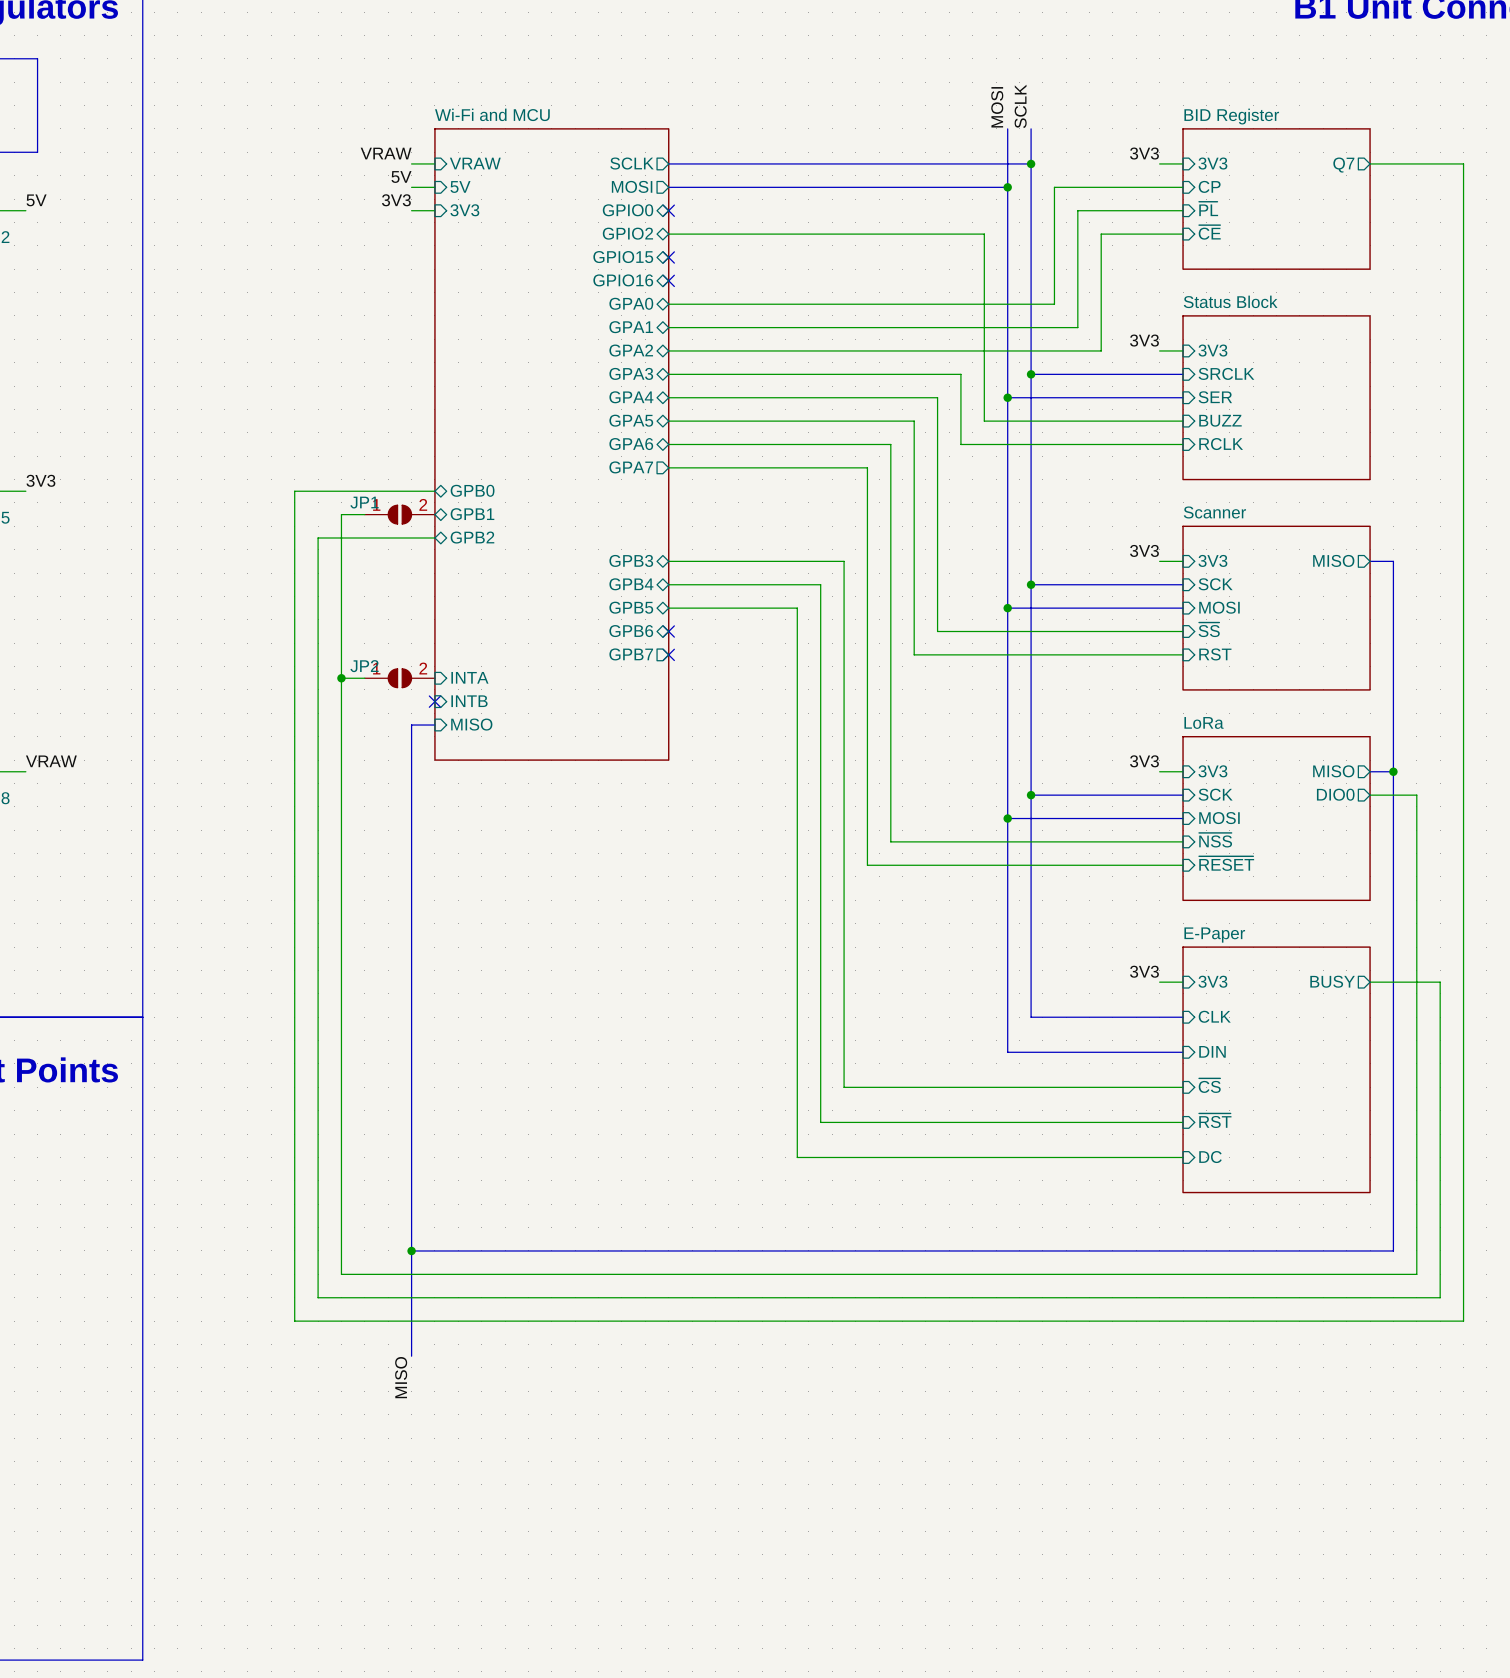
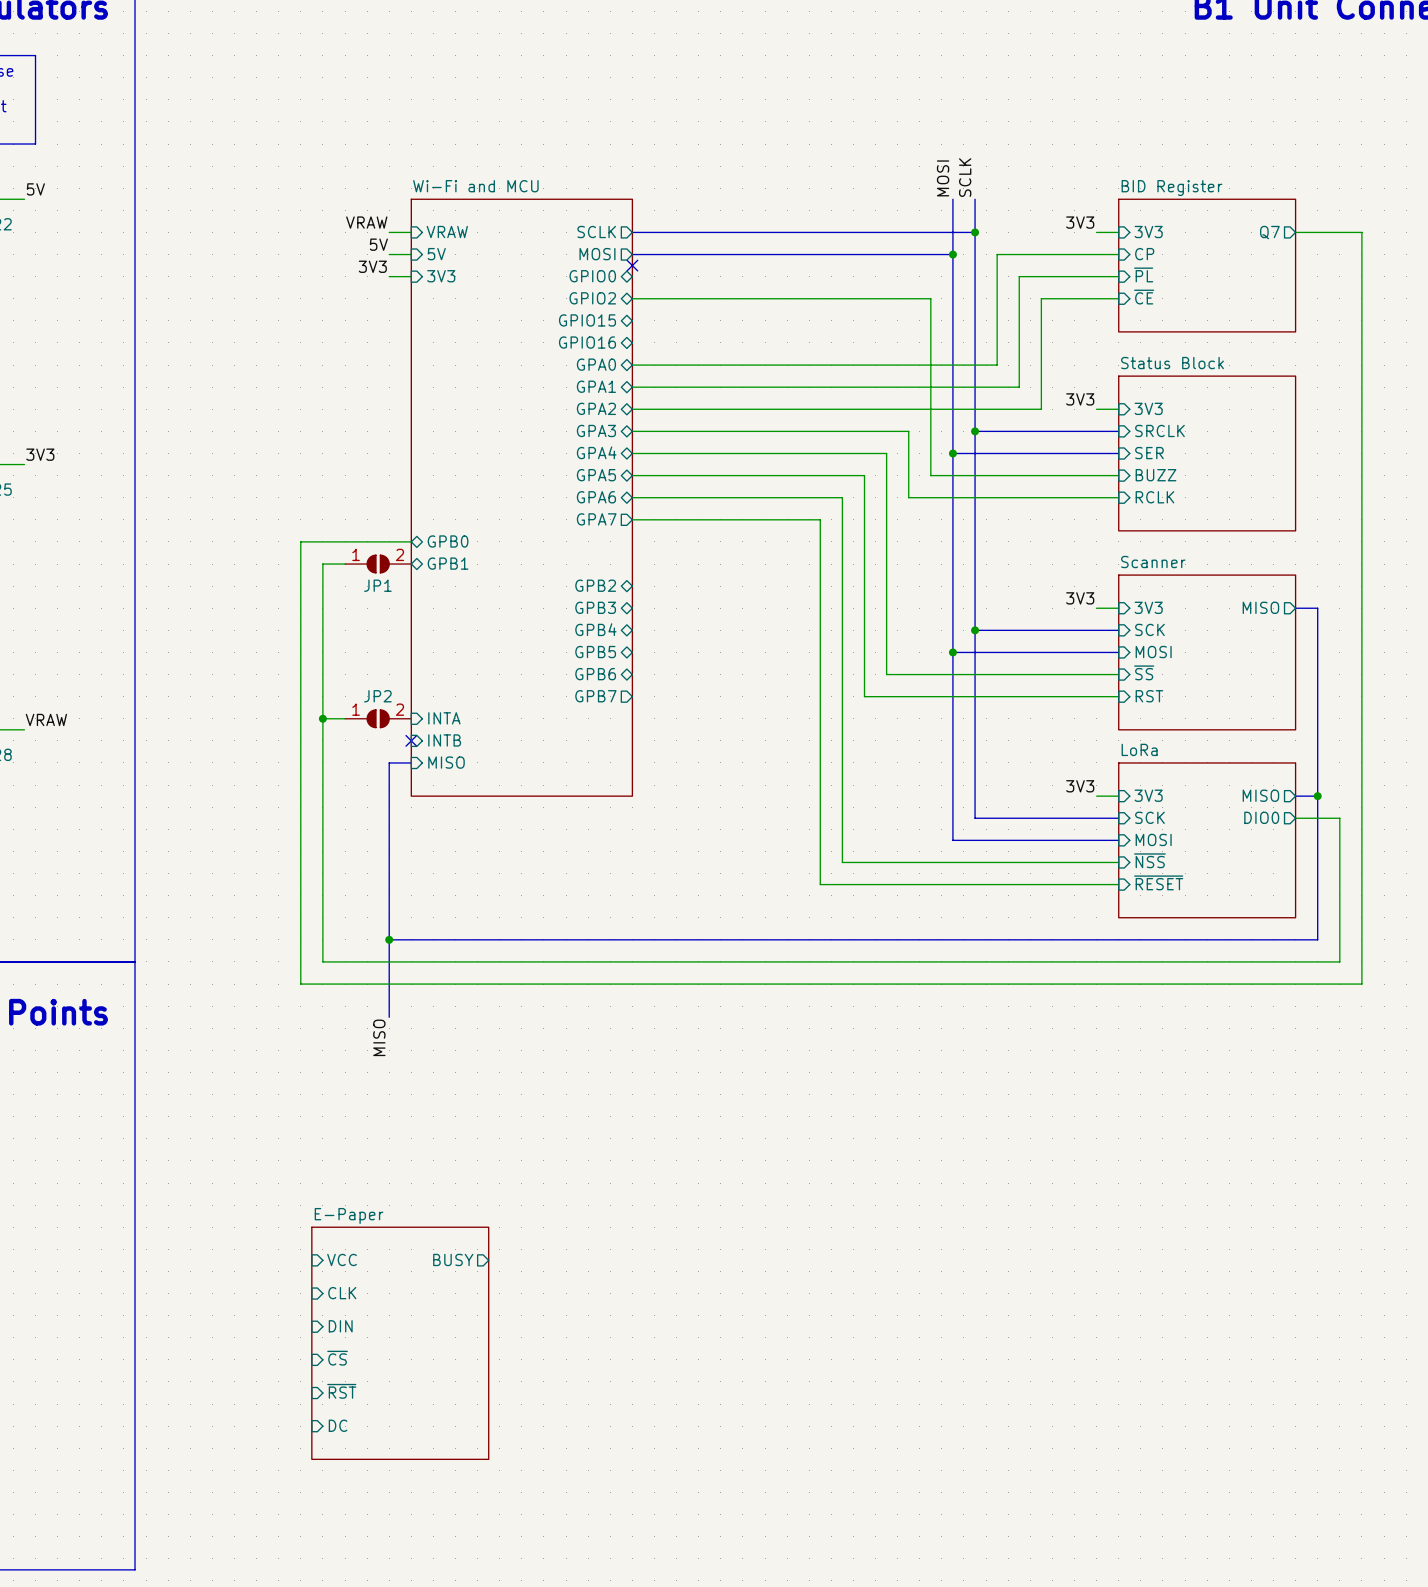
label position: SCLK (1020, 106) -> SCLK (965, 177)
label position: MOSI (997, 107) -> MOSI (943, 178)
bus: (1007, 128) (1007, 210) -> none
bus: (1031, 128) (1031, 210) -> none
label position: VRAW (386, 153) -> VRAW (366, 222)
label: 3V3 (1144, 153) -> none
wire: (411, 163) (434, 163) -> (389, 232) (411, 232)
sheet pin position: VRAW (475, 163) -> VRAW (447, 232)
sheet pin position: SCLK (631, 163) -> SCLK (596, 232)
bus: (668, 163) (1031, 163) -> (632, 232) (975, 232)
junction: (1031, 163) -> none
wire: (1159, 163) (1183, 163) -> (1096, 232) (1118, 232)
sheet pin: 3V3 (1212, 163) -> none
wire: (1370, 163) (1463, 163) (1463, 1321) (294, 1321) (294, 491) (434, 491) -> none
sheet pin position: Q7 (1343, 165) -> Q7 (1269, 232)
label position: 5V (401, 176) -> 5V (378, 244)
sheet pin position: 5V (460, 186) -> 5V (436, 254)
sheet pin position: MOSI (632, 186) -> MOSI (597, 254)
sheet pin position: CP (1209, 186) -> CP (1144, 254)
wire: (411, 187) (434, 187) -> (389, 254) (411, 254)
bus: (668, 187) (1007, 187) -> (632, 254) (952, 254)
junction: (1007, 187) -> none
wire: (1183, 187) (1054, 187) (1054, 269) -> (1118, 254) (997, 254)
sheet BID Register position: (1276, 199) -> (1207, 265)
label position: 3V3 (396, 200) -> 3V3 (372, 266)
sheet pin position: ~{PL} (1208, 208) -> ~{PL} (1143, 274)
wire: (411, 210) (434, 210) -> (389, 276) (411, 276)
sheet pin position: 3V3 (464, 210) -> 3V3 (441, 276)
sheet pin position: GPIO0 (628, 210) -> GPIO0 (592, 276)
no-connect mark: (668, 210) -> none
wire: (1183, 210) (1077, 210) (1077, 292) -> (1118, 276) (1019, 276)
sheet pin position: ~{CE} (1209, 232) -> ~{CE} (1144, 297)
sheet pin position: GPIO2 (627, 233) -> GPIO2 (592, 298)
wire: (668, 234) (984, 234) (984, 315) -> (632, 298) (930, 298)
wire: (1183, 234) (1101, 234) (1101, 315) -> (1118, 298) (1041, 298)
label: none -> 3V3 (1080, 222)
junction: none -> (975, 232)
sheet pin: none -> 3V3 (1148, 232)
sheet pin position: GPIO15 (623, 257) -> GPIO15 (587, 320)
no-connect mark: (668, 257) -> none
junction: none -> (952, 254)
sheet pin position: GPIO16 (623, 280) -> GPIO16 (587, 342)
sheet pin position: GPA0 (631, 303) -> GPA0 (596, 364)
wire: (668, 304) (1054, 304) -> (632, 365) (997, 365) (997, 287)
sheet pin position: GPA1 (631, 327) -> GPA1 (596, 386)
wire: (668, 327) (1077, 327) -> (632, 387) (1019, 387) (1019, 309)
label: 3V3 (1144, 340) -> none
sheet pin position: GPA2 (631, 350) -> GPA2 (596, 408)
wire: (668, 350) (1101, 350) -> (632, 409) (1041, 409) (1041, 331)
wire: (1159, 350) (1183, 350) -> (1096, 409) (1118, 409)
sheet pin: 3V3 (1212, 350) -> none
sheet pin position: GPA3 (631, 373) -> GPA3 (596, 430)
sheet pin position: SRCLK (1226, 373) -> SRCLK (1159, 430)
wire: (668, 374) (960, 374) (960, 444) (1183, 444) -> (632, 431) (908, 431) (908, 497) (1118, 497)
bus: (1031, 374) (1183, 374) -> (975, 431) (1118, 431)
junction: (1031, 374) -> none
sheet pin position: GPA4 (631, 397) -> GPA4 (596, 452)
wire: (668, 397) (937, 397) (937, 479) -> (632, 453) (886, 453)
bus: (1007, 397) (1183, 397) -> (952, 453) (1118, 453)
junction: (1007, 397) -> none
sheet pin position: SER (1215, 397) -> SER (1149, 453)
sheet Status Block position: (1276, 397) -> (1207, 453)
sheet pin position: GPA5 (631, 420) -> GPA5 (596, 475)
sheet pin position: BUZZ (1220, 420) -> BUZZ (1156, 475)
wire: (668, 421) (914, 421) (914, 502) -> (632, 475) (864, 475)
wire: (984, 421) (1183, 421) -> (930, 398) (930, 475) (1118, 475)
label: none -> 3V3 (1080, 399)
sheet pin: none -> 3V3 (1148, 408)
sheet Wi-Fi and MCU position: (551, 444) -> (521, 497)
sheet pin position: GPA6 (631, 444) -> GPA6 (596, 497)
wire: (668, 444) (890, 444) (890, 526) -> (632, 497) (842, 497)
sheet pin position: RCLK (1221, 444) -> RCLK (1154, 497)
junction: none -> (975, 431)
sheet pin position: GPA7 (631, 467) -> GPA7 (596, 519)
wire: (668, 467) (867, 467) (867, 549) -> (632, 519) (820, 519)
junction: none -> (952, 453)
sheet pin position: GPB0 (472, 490) -> GPB0 (448, 541)
JP1 name position: JP1 (364, 502) -> JP1 (377, 585)
wire: (364, 514) (341, 514) (341, 596) -> (345, 564) (322, 564)
JP1 position: (399, 514) -> (378, 564)
sheet pin position: GPB1 (472, 514) -> GPB1 (448, 563)
wire: (434, 537) (318, 537) (318, 573) -> (411, 541) (300, 541)
sheet pin rotation: 0° (472, 537) -> 180° (595, 585)
sheet pin position: GPB2 (472, 537) -> GPB2 (595, 585)
label: 3V3 (1144, 550) -> none
sheet pin position: GPB3 (631, 560) -> GPB3 (595, 607)
sheet pin: 3V3 (1212, 560) -> none
sheet pin: MISO (1333, 560) -> none
wire: (668, 561) (844, 561) (844, 1087) (1183, 1087) -> none
wire: (1159, 561) (1183, 561) -> (1096, 608) (1118, 608)
bus: (1370, 561) (1393, 561) (1393, 643) -> (1295, 608) (1317, 608)
sheet pin position: GPB4 (631, 584) -> GPB4 (595, 629)
wire: (668, 584) (820, 584) (820, 1122) (1183, 1122) -> none
bus: (1031, 584) (1183, 584) -> (975, 630) (1118, 630)
junction: (1031, 584) -> none
sheet pin: SCK (1215, 584) -> none
sheet pin position: GPB5 (631, 607) -> GPB5 (595, 652)
sheet pin: MOSI (1219, 607) -> none
wire: (668, 608) (797, 608) (797, 1157) (1183, 1157) -> none
bus: (1007, 608) (1183, 608) -> (952, 652) (1118, 652)
junction: (1007, 608) -> none
sheet Scanner position: (1276, 608) -> (1207, 652)
sheet pin position: ~{SS} (1209, 629) -> ~{SS} (1144, 672)
sheet pin position: GPB6 (631, 631) -> GPB6 (595, 674)
no-connect mark: (668, 631) -> none
wire: (937, 631) (1183, 631) -> (886, 597) (886, 674) (1118, 674)
label: none -> 3V3 (1080, 598)
sheet pin: none -> 3V3 (1148, 607)
sheet pin: none -> MISO (1260, 607)
sheet pin position: GPB7 (631, 654) -> GPB7 (595, 696)
no-connect mark: (668, 654) -> none
wire: (914, 654) (1183, 654) -> (864, 619) (864, 696) (1118, 696)
sheet pin position: RST (1215, 654) -> RST (1149, 696)
JP2 name position: JP2 (364, 666) -> JP2 (377, 696)
junction: none -> (975, 630)
sheet pin: none -> SCK (1149, 629)
sheet pin position: INTA (469, 677) -> INTA (444, 718)
wire: (341, 678) (364, 678) -> (322, 718) (345, 718)
junction: (341, 678) -> none
JP2 position: (399, 678) -> (378, 718)
junction: none -> (952, 652)
sheet pin: none -> MOSI (1153, 652)
no-connect mark: (434, 701) -> none
sheet pin position: INTB (469, 701) -> INTB (444, 740)
sheet pin position: MISO (471, 724) -> MISO (446, 762)
bus: (434, 725) (411, 725) (411, 806) -> (411, 762) (389, 762)
junction: none -> (322, 718)
label: 3V3 (1144, 761) -> none
wire: (1159, 771) (1183, 771) -> none
sheet pin: 3V3 (1212, 771) -> none
sheet pin: MISO (1333, 771) -> none
bus: (1370, 771) (1393, 771) -> (1295, 796) (1317, 796)
junction: (1393, 771) -> none
no-connect mark: none -> (411, 740)
sheet pin: SCK (1215, 794) -> none
sheet pin position: DIO0 (1335, 794) -> DIO0 (1261, 817)
bus: (1031, 795) (1183, 795) -> none
junction: (1031, 795) -> none
wire: (1370, 795) (1416, 795) (1416, 865) -> (1295, 818) (1339, 818)
bus: (1007, 818) (1183, 818) -> none
junction: (1007, 818) -> none
sheet pin: MOSI (1219, 818) -> none
sheet LoRa position: (1276, 818) -> (1207, 840)
label: none -> 3V3 (1080, 786)
sheet pin: ~{NSS} (1215, 840) -> 3V3 (1148, 795)
wire: (890, 841) (1159, 841) -> (842, 796) (842, 862) (1118, 862)
sheet pin: none -> MISO (1260, 795)
junction: none -> (1317, 796)
sheet pin: ~{RESET} (1226, 863) -> SCK (1149, 817)
wire: (867, 865) (1183, 865) -> (820, 818) (820, 884) (1118, 884)
bus: (1031, 865) (1031, 1017) (1183, 1017) -> (975, 818) (1118, 818)
bus: (1007, 888) (1007, 1052) (1183, 1052) -> (952, 840) (1118, 840)
sheet pin: none -> MOSI (1153, 839)
sheet pin: none -> ~{NSS} (1149, 860)
sheet pin: none -> ~{RESET} (1158, 882)
label: 3V3 (1144, 971) -> none
sheet pin: 3V3 (1212, 981) -> none
sheet pin: BUSY (1332, 981) -> none
wire: (1159, 982) (1183, 982) -> none
wire: (1370, 982) (1440, 982) -> (1295, 232) (1361, 232) (1361, 928)
junction: none -> (389, 939)
bus: (1393, 993) (1393, 1250) (411, 1250) -> (1317, 939) (389, 939)
sheet pin: CLK (1214, 1016) -> none
wire: (341, 1017) (341, 1274) (1416, 1274) (1416, 1017) -> (322, 961) (1339, 961)
wire: (318, 1040) (318, 1297) (1440, 1297) (1440, 1040) -> (300, 984) (1361, 984)
sheet pin: DIN (1212, 1051) -> none
sheet E-Paper: (1276, 1069) -> none
bus: (411, 1075) (411, 1356) -> none
sheet pin: ~{CS} (1209, 1085) -> none
label: none -> MISO (379, 1037)
sheet pin: ~{RST} (1215, 1120) -> none
sheet pin: DC (1210, 1157) -> none
junction: (411, 1250) -> none
sheet pin: none -> VCC (342, 1259)
sheet pin: none -> BUSY (453, 1259)
sheet pin: none -> CLK (342, 1293)
label: MISO (401, 1377) -> none
sheet pin: none -> DIN (340, 1326)
sheet E-Paper: none -> (400, 1343)
sheet pin: none -> ~{CS} (337, 1358)
sheet pin: none -> ~{RST} (341, 1391)
sheet pin: none -> DC (338, 1425)

